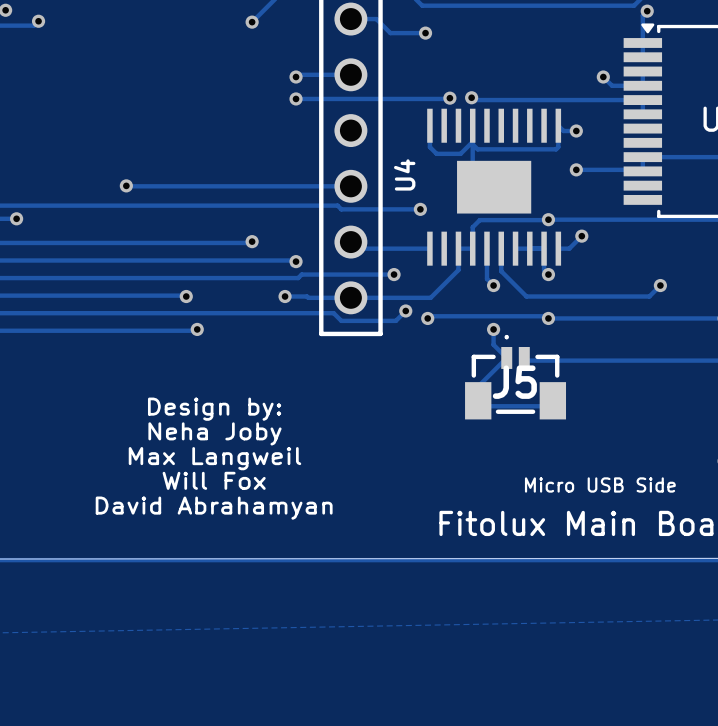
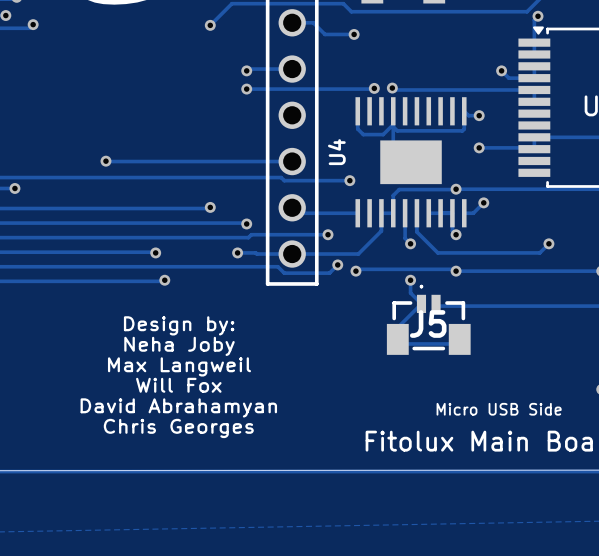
text: none -> Design by: (179, 325)
text: Design by: (214, 409) -> Neha Joby (179, 346)
text: Neha Joby (214, 433) -> Max Langweil (179, 366)
text: Max Langweil (214, 458) -> Will Fox (178, 385)
text: Will Fox (214, 480) -> David Abrahamyan (178, 407)
text: David Abrahamyan (214, 508) -> Chris Georges (178, 428)

